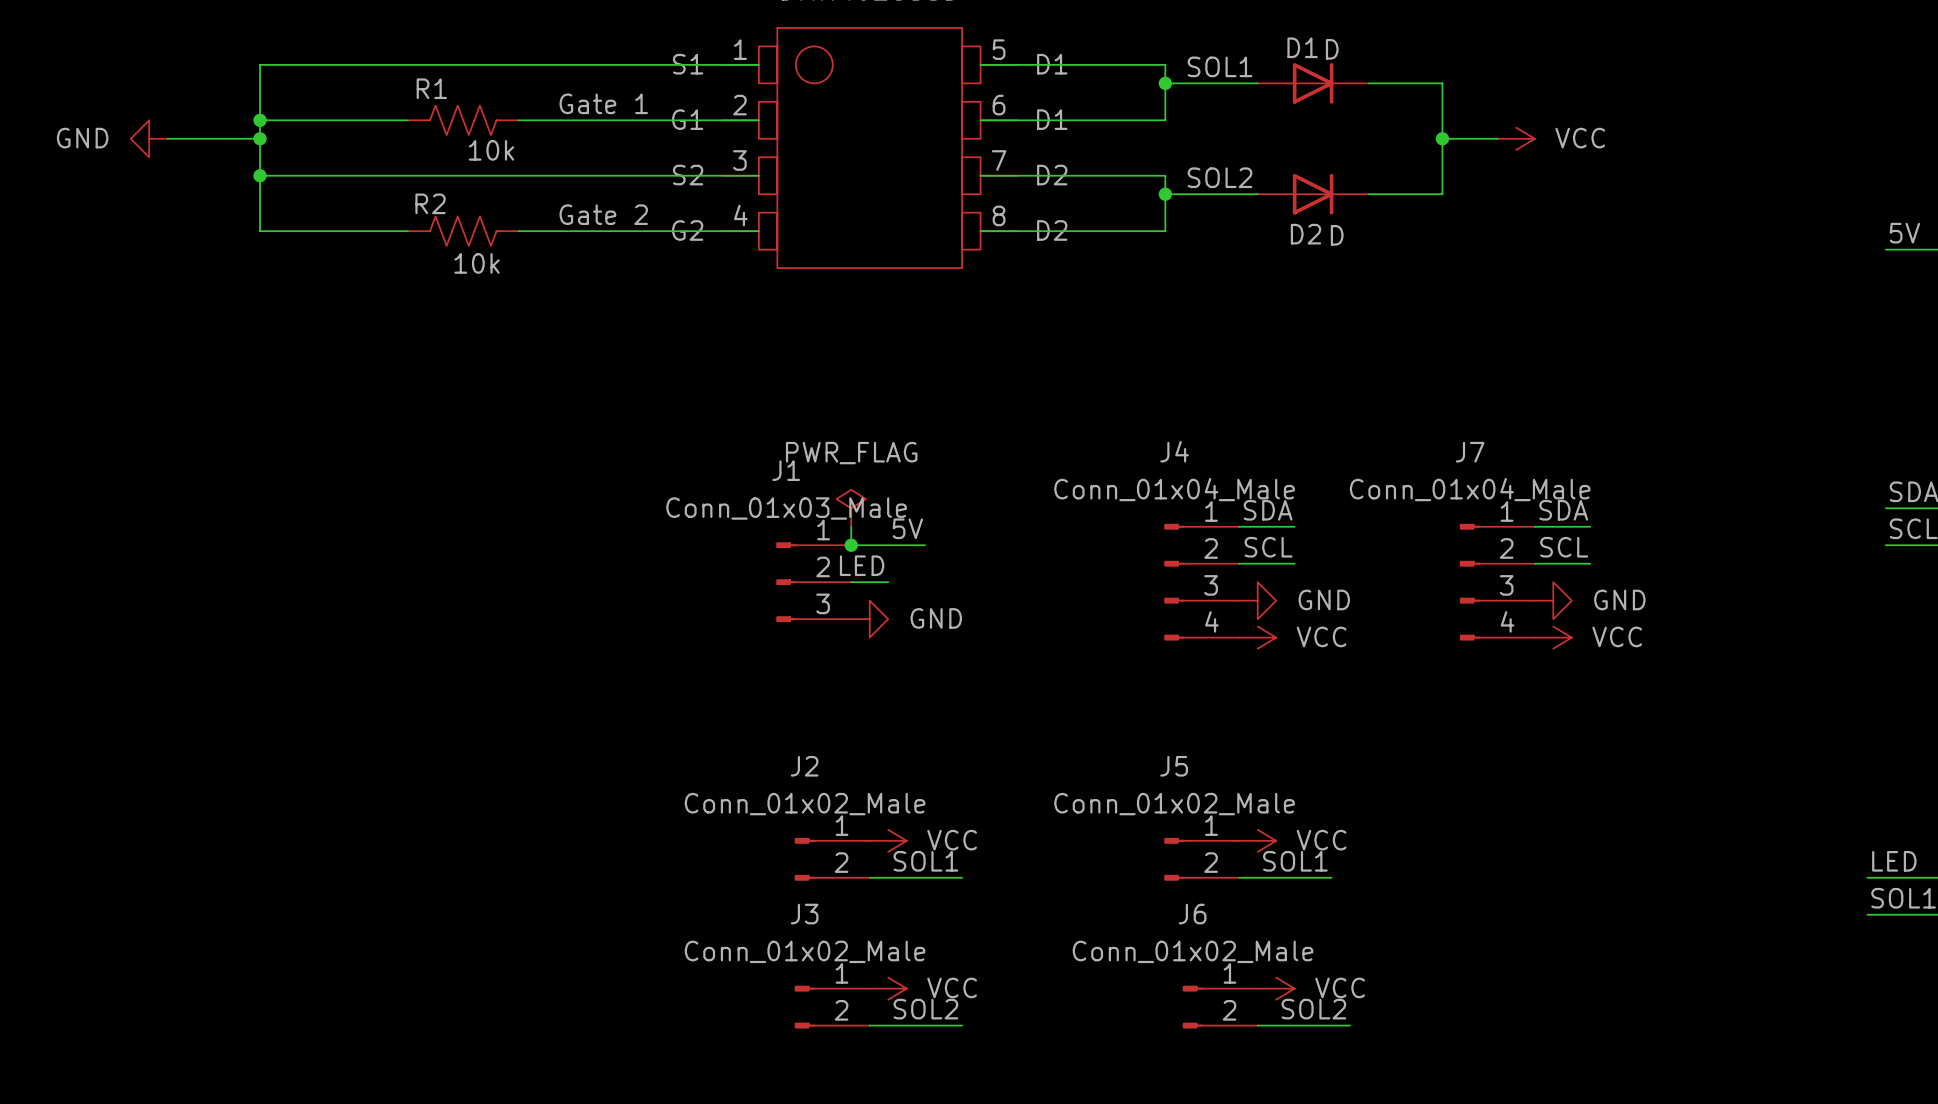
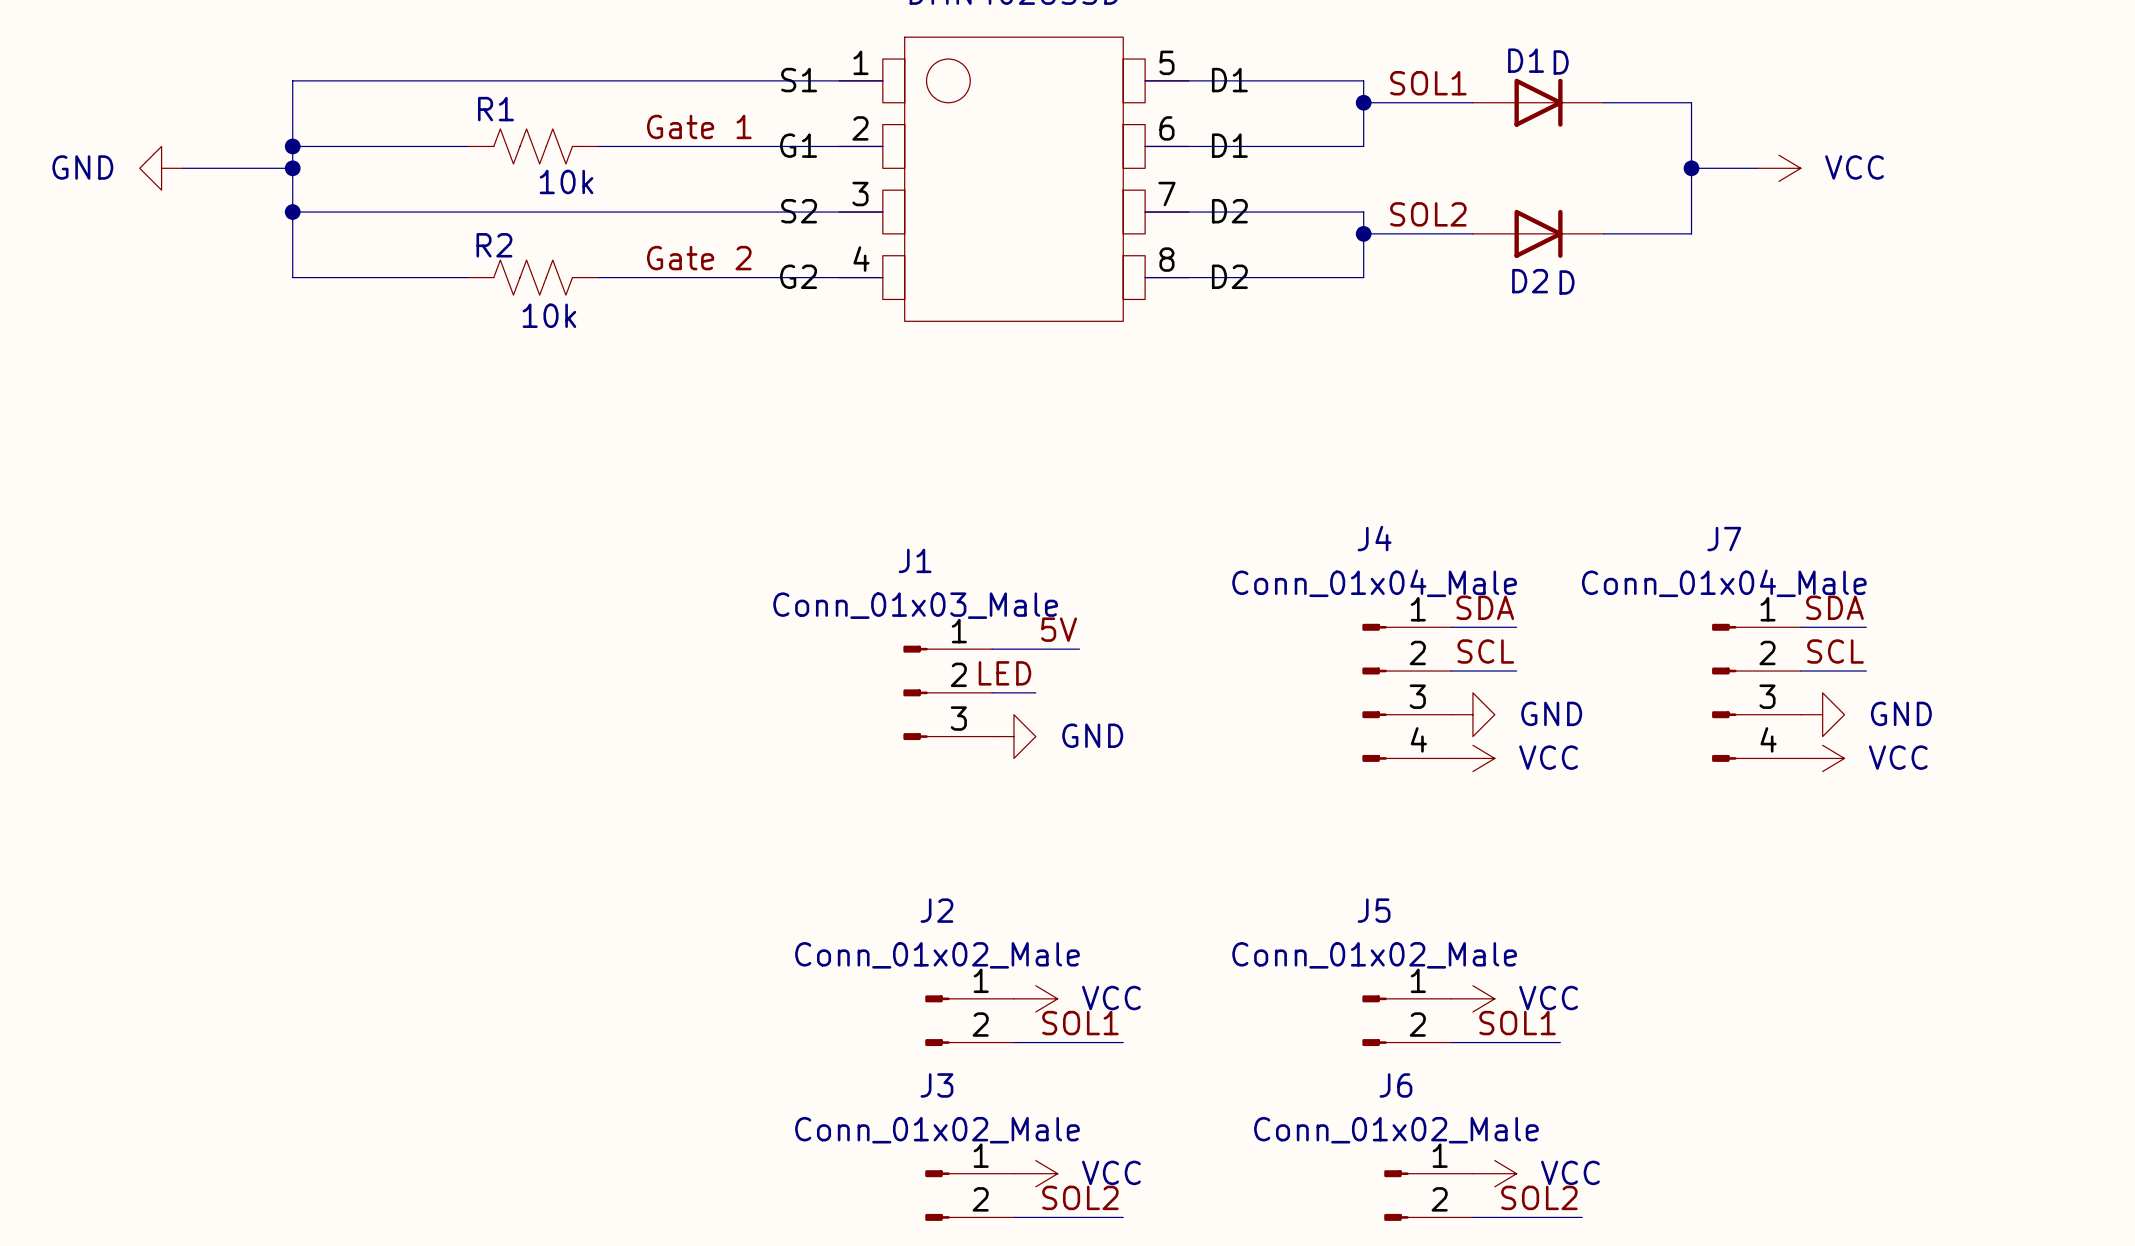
power symbol: PWR_FLAG (851, 508) -> none
wire: (851, 526) (851, 545) -> none
junction: (851, 545) -> none

